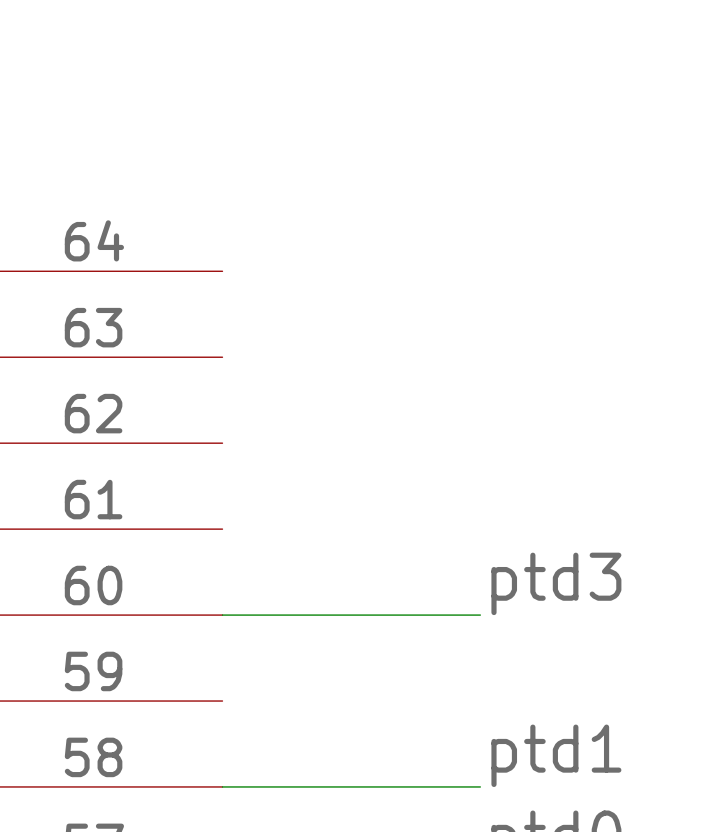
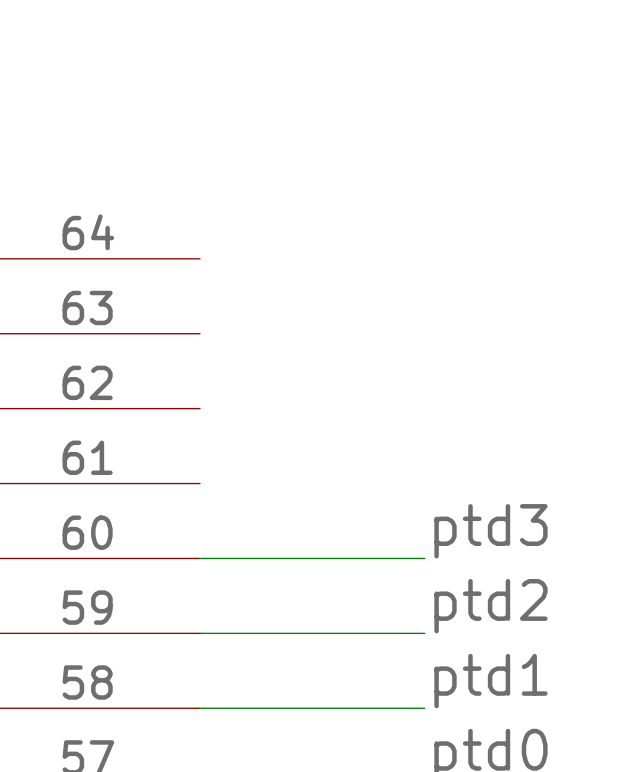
label: none -> ptd2 (490, 606)
wire: none -> (199, 633) (424, 633)

